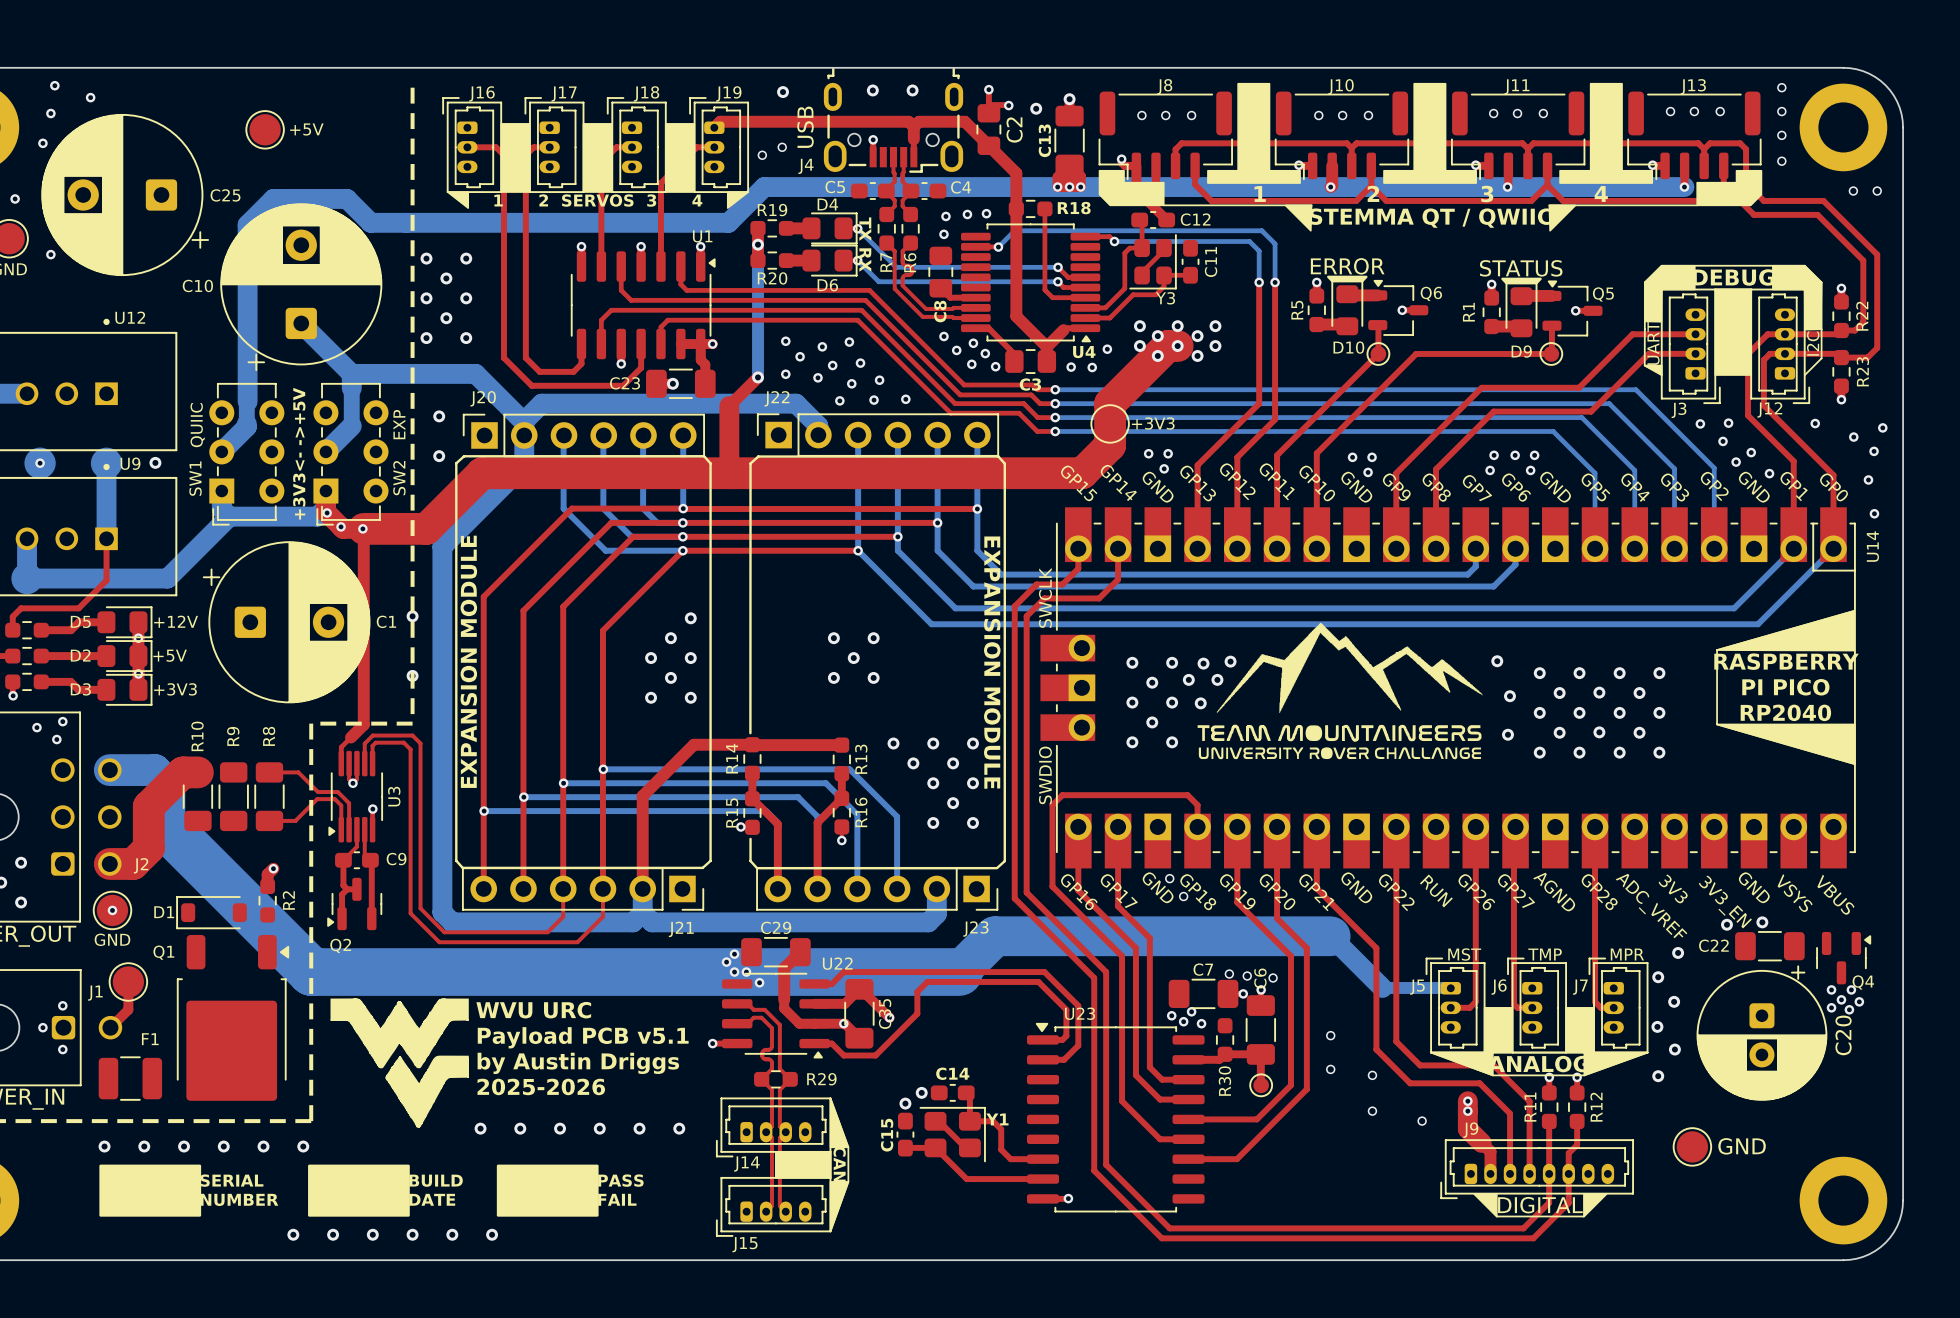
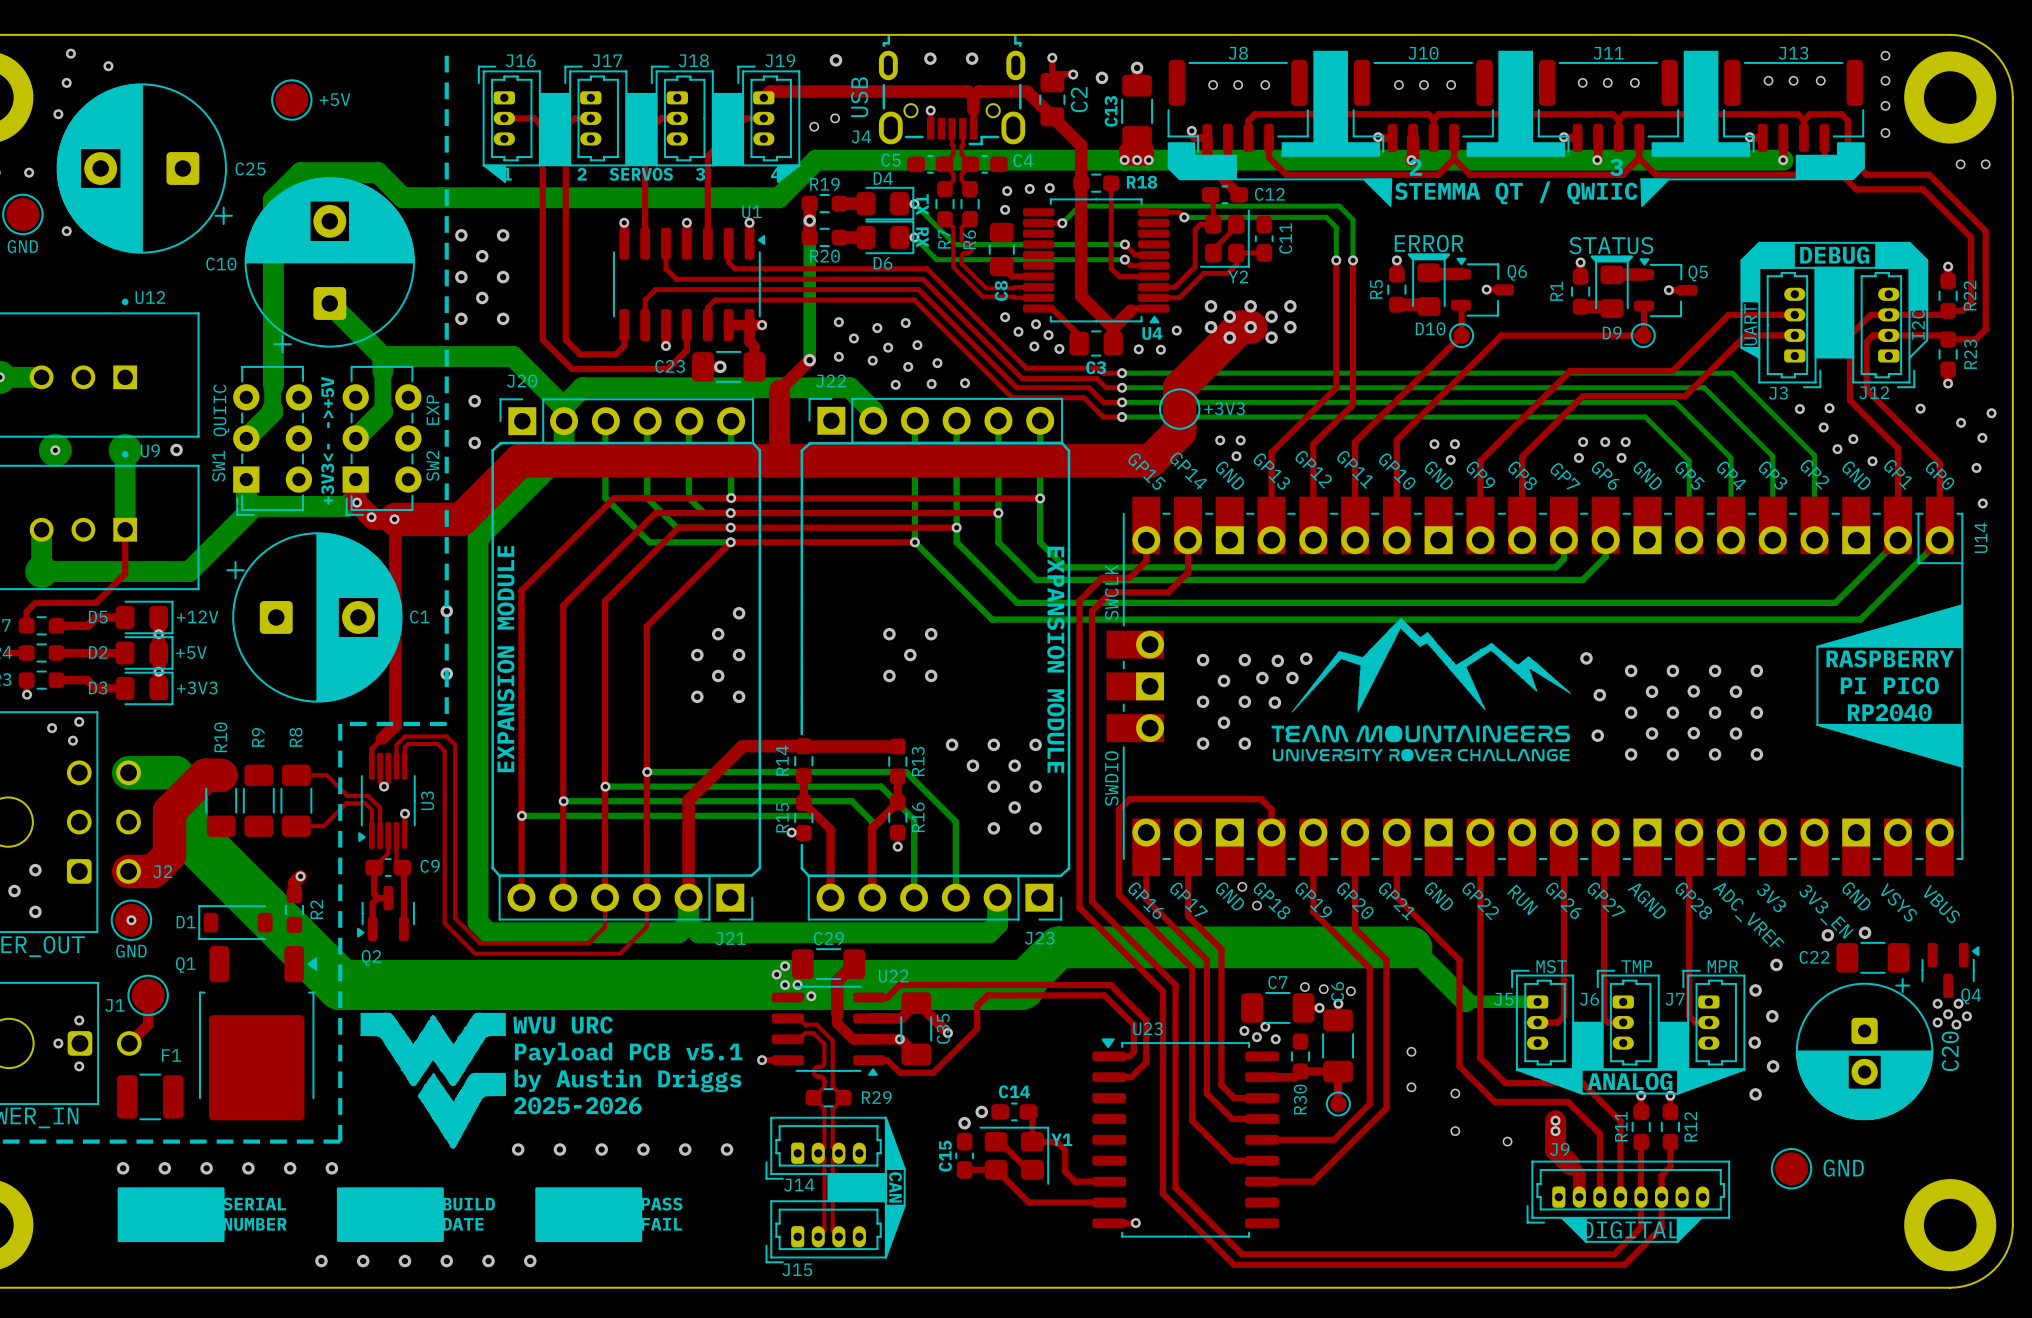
Y3 name: Y3 (1165, 298) -> Y2 (1238, 276)

